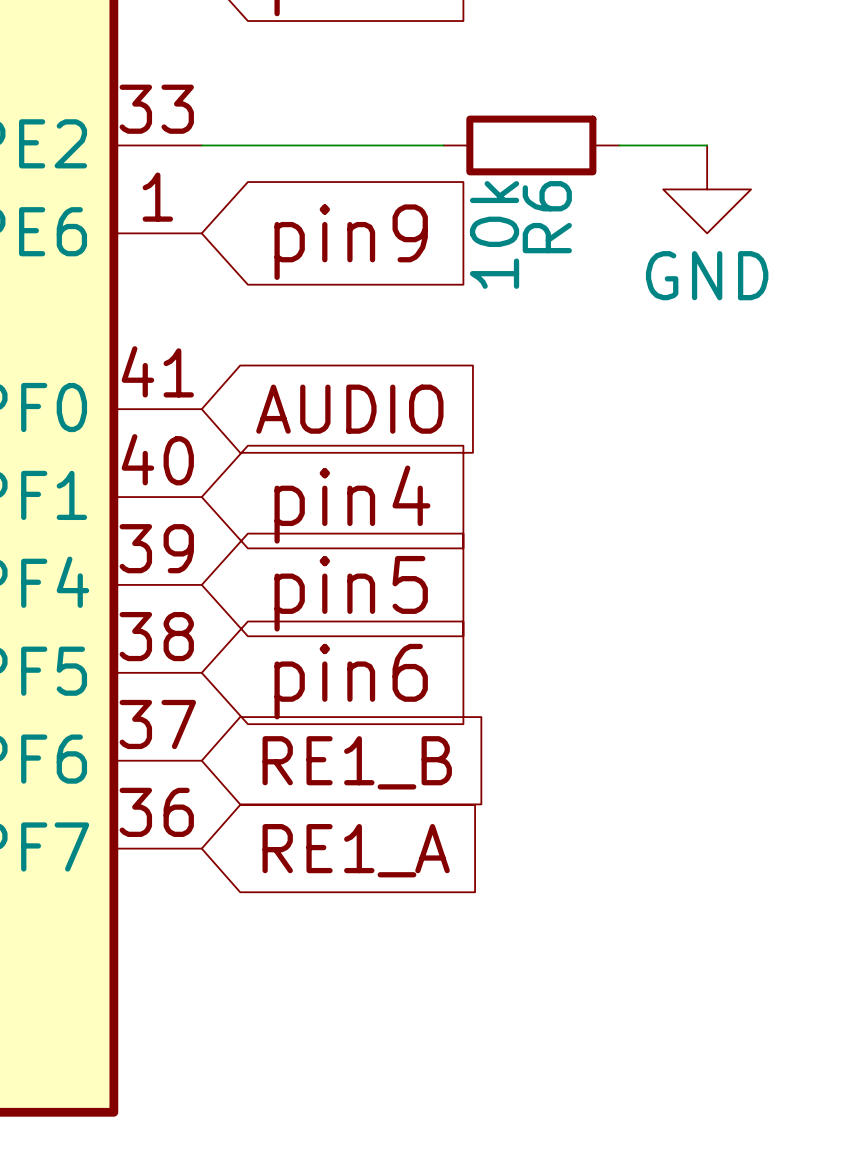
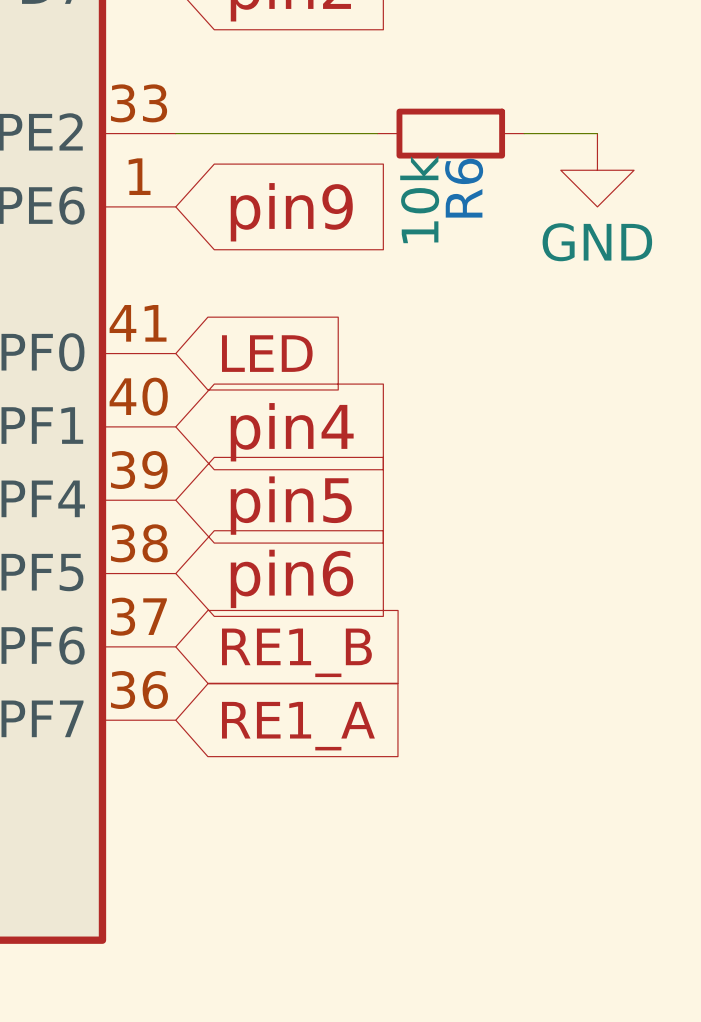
global label: AUDIO (349, 409) -> LED (267, 353)

